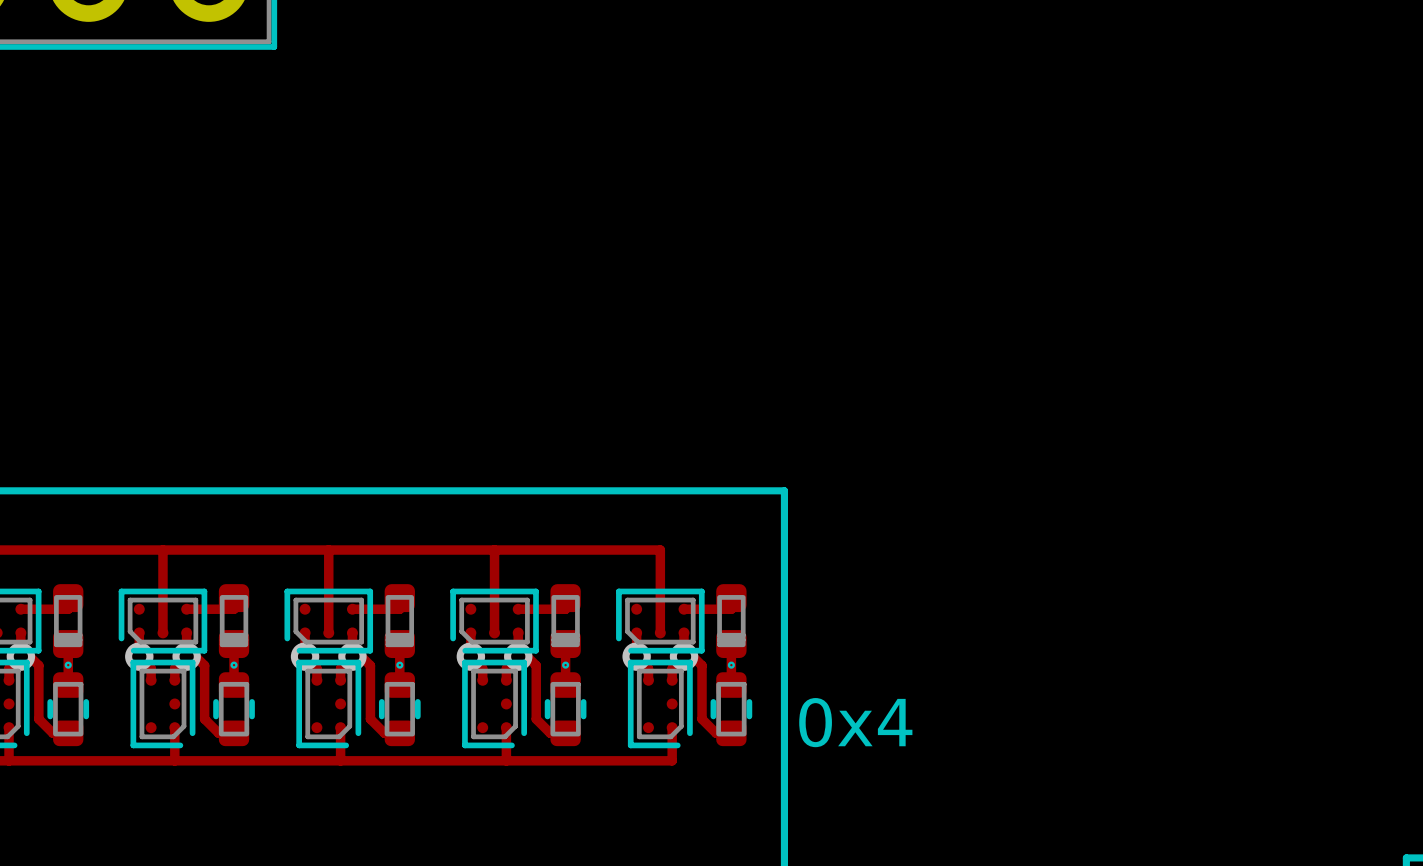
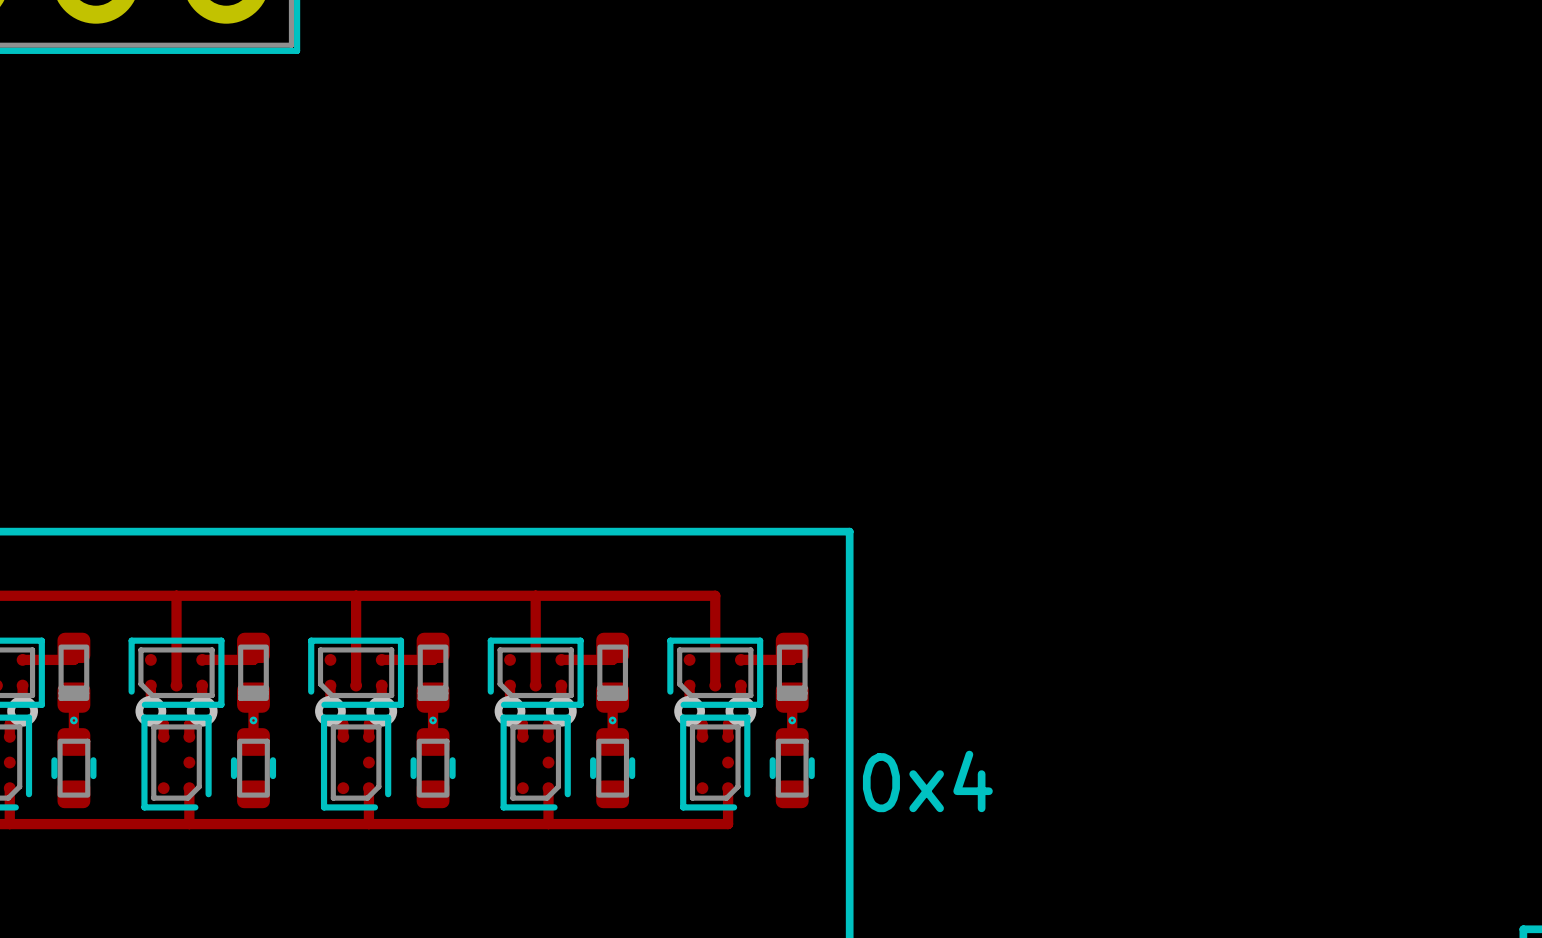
track: (20, 656) (29, 656) (38, 665) (38, 719) (53, 733) (68, 733) -> none
track: (186, 656) (195, 656) (204, 665) (204, 719) (218, 733) (234, 733) -> none
track: (352, 656) (361, 656) (370, 665) (370, 719) (384, 733) (399, 733) -> none
track: (518, 656) (527, 656) (536, 665) (536, 719) (550, 733) (565, 733) -> none
track: (684, 656) (693, 656) (702, 665) (702, 719) (716, 733) (731, 733) -> none

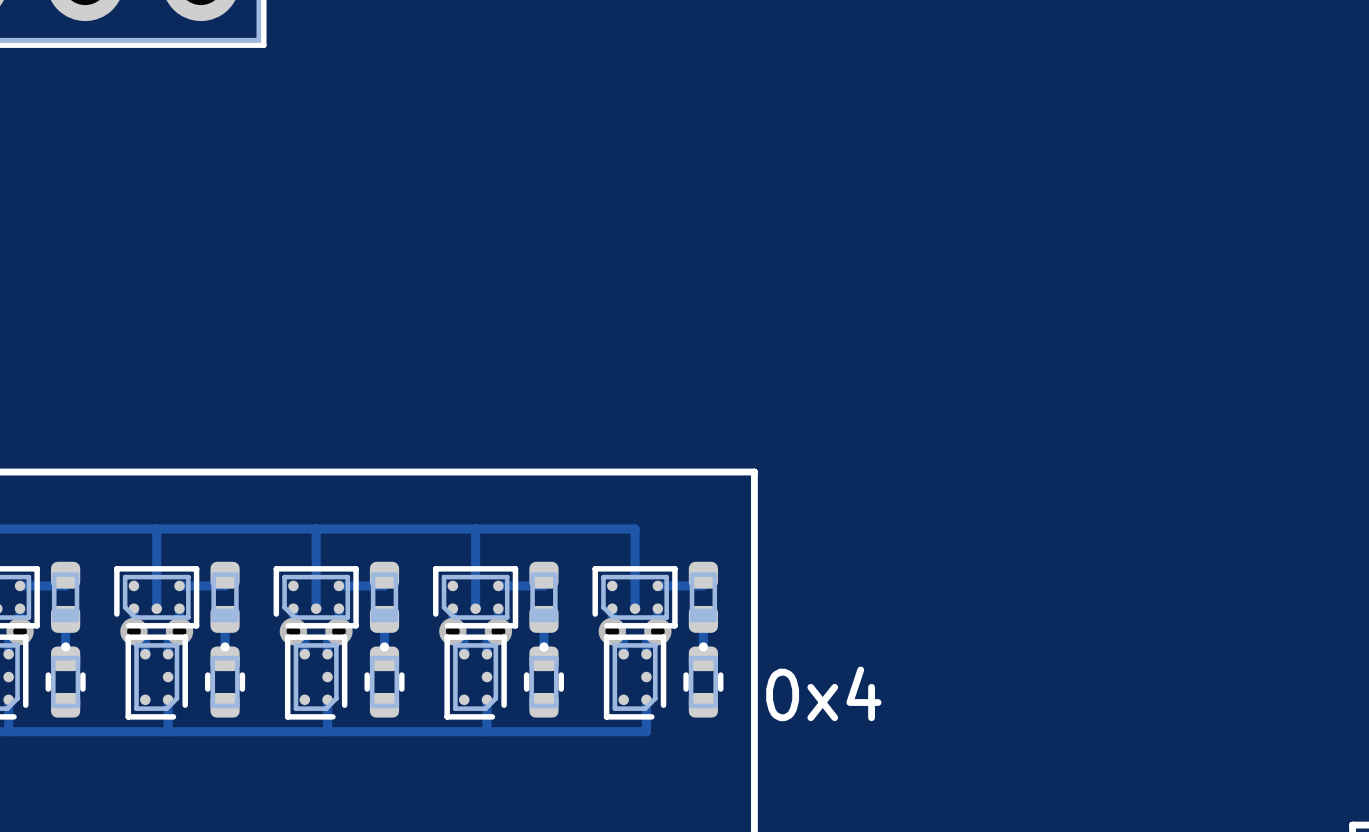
part footprint: [57, 632, 91, 725] -> [51, 561, 81, 652]
part footprint: [237, 632, 270, 725] -> [210, 561, 240, 652]
part footprint: [416, 632, 450, 725] -> [369, 561, 400, 652]
part footprint: [596, 632, 630, 725] -> [529, 561, 559, 652]
part footprint: [775, 632, 809, 725] -> [688, 561, 718, 652]

